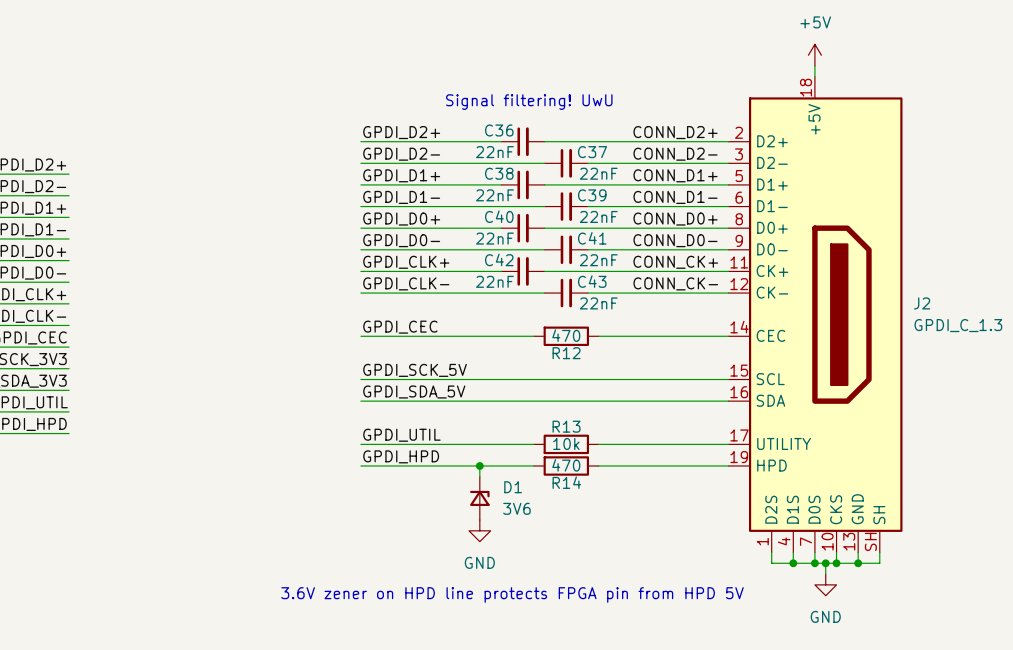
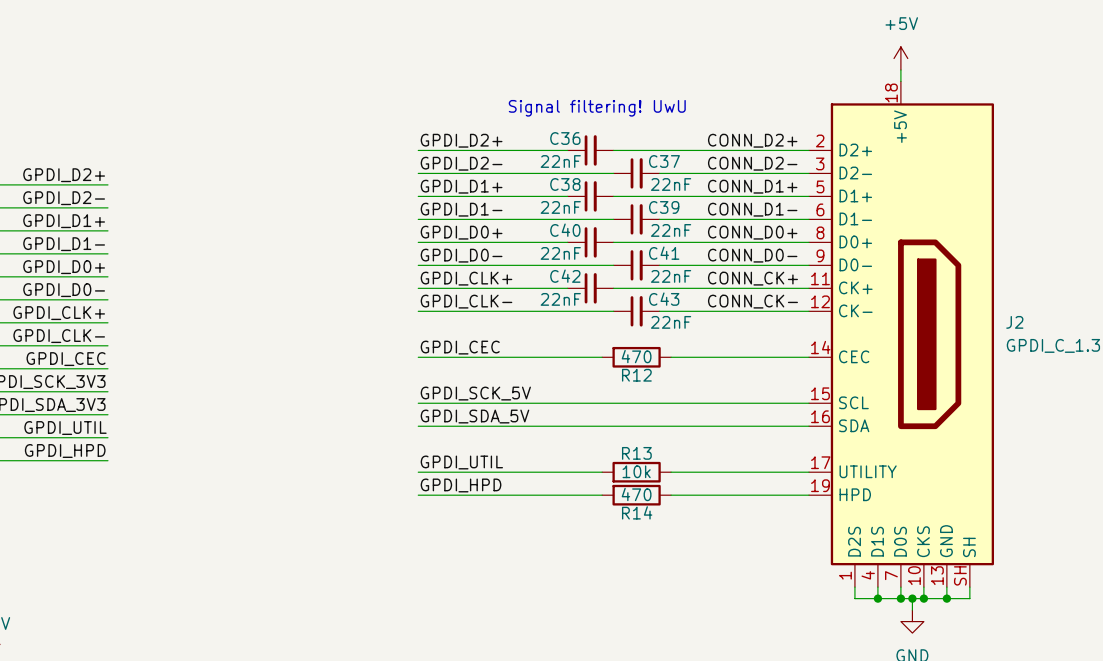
wire: (479, 465) (479, 476) -> none
junction: (479, 465) -> none
D1: 3V6 (479, 498) -> none
power symbol: GND (479, 530) -> none
text: 3.6V zener on HPD line protects FPGA pin from HPD 5V (512, 594) -> none

